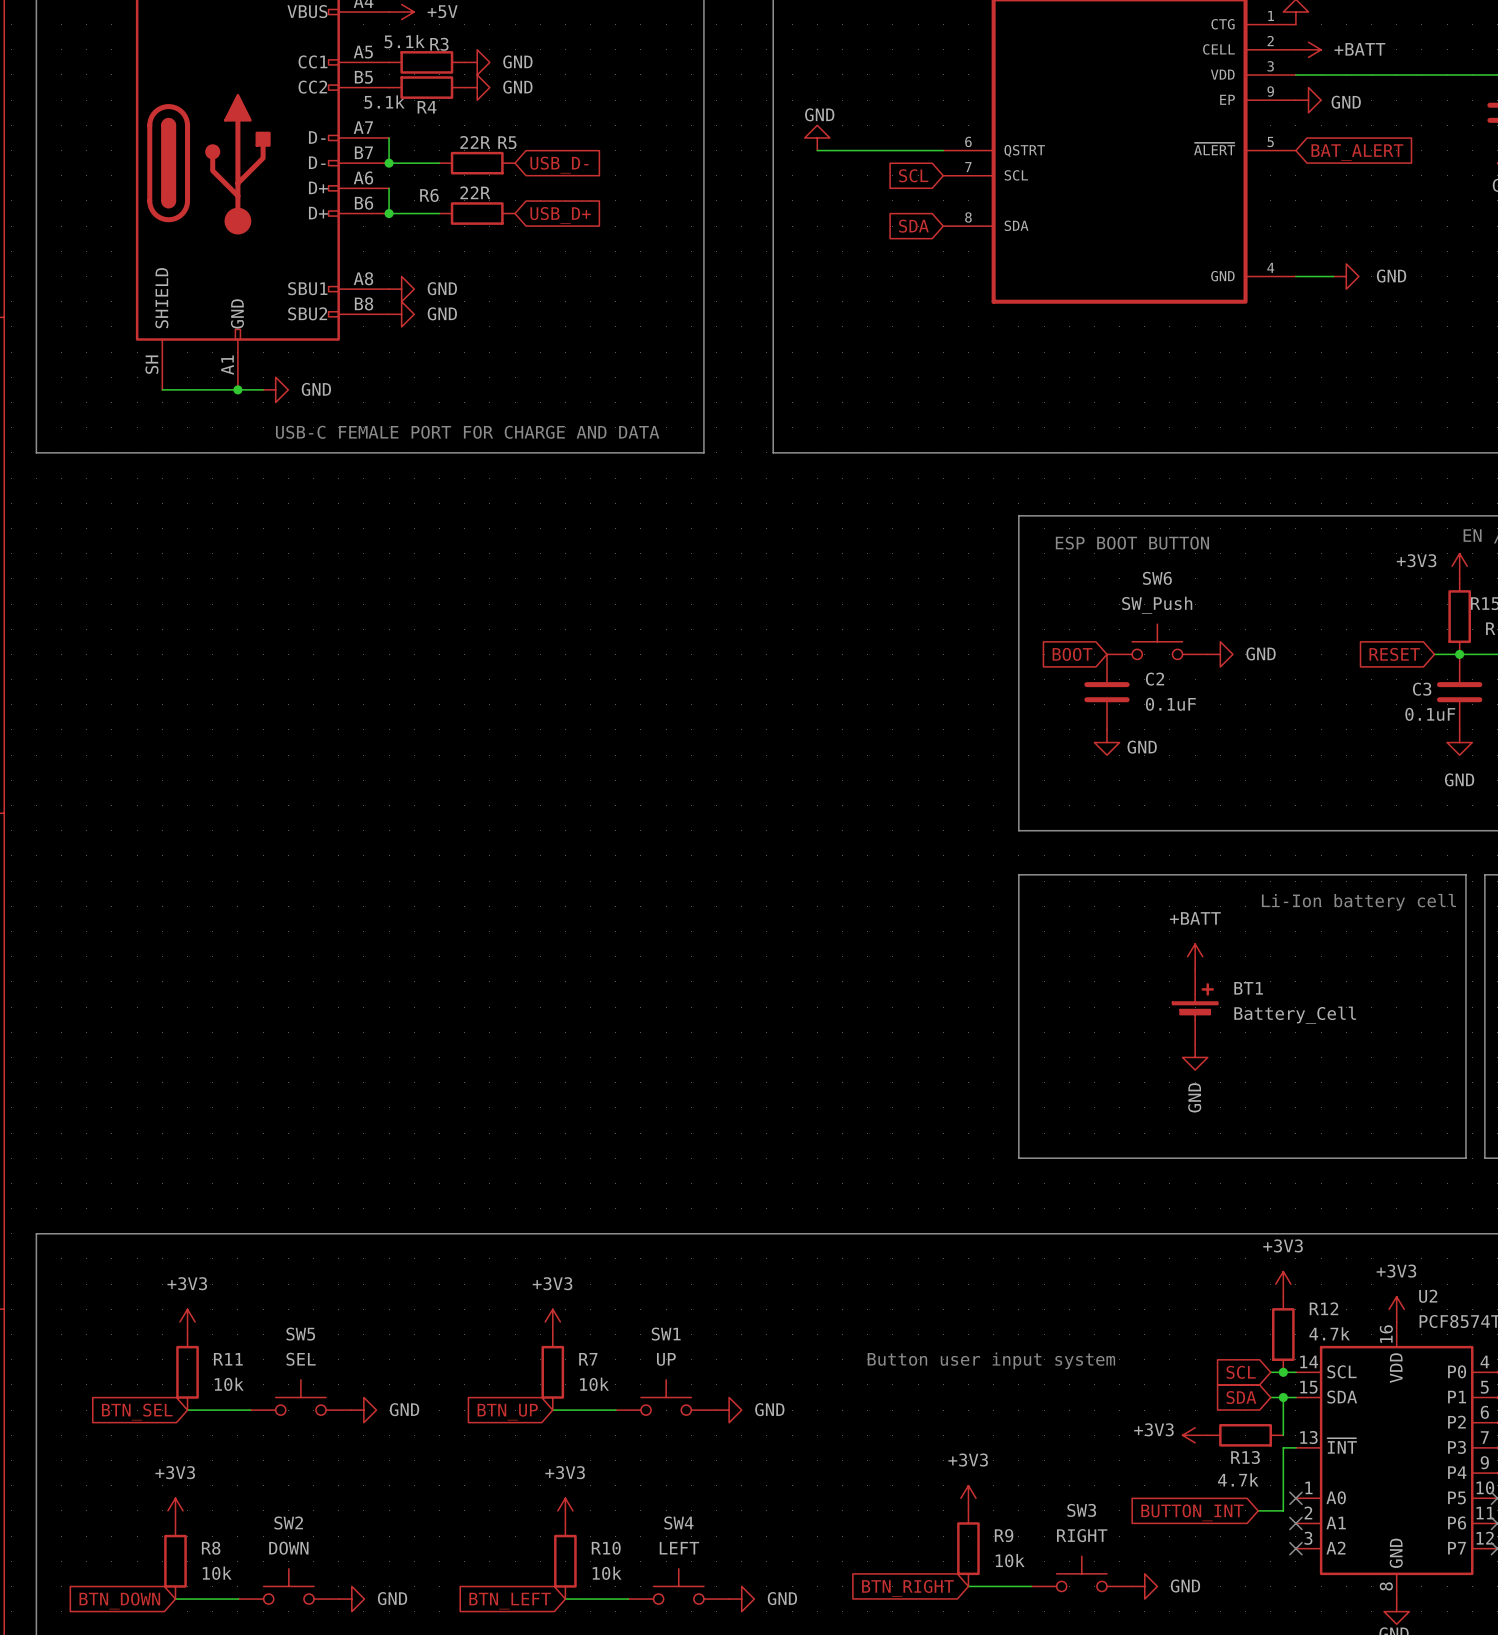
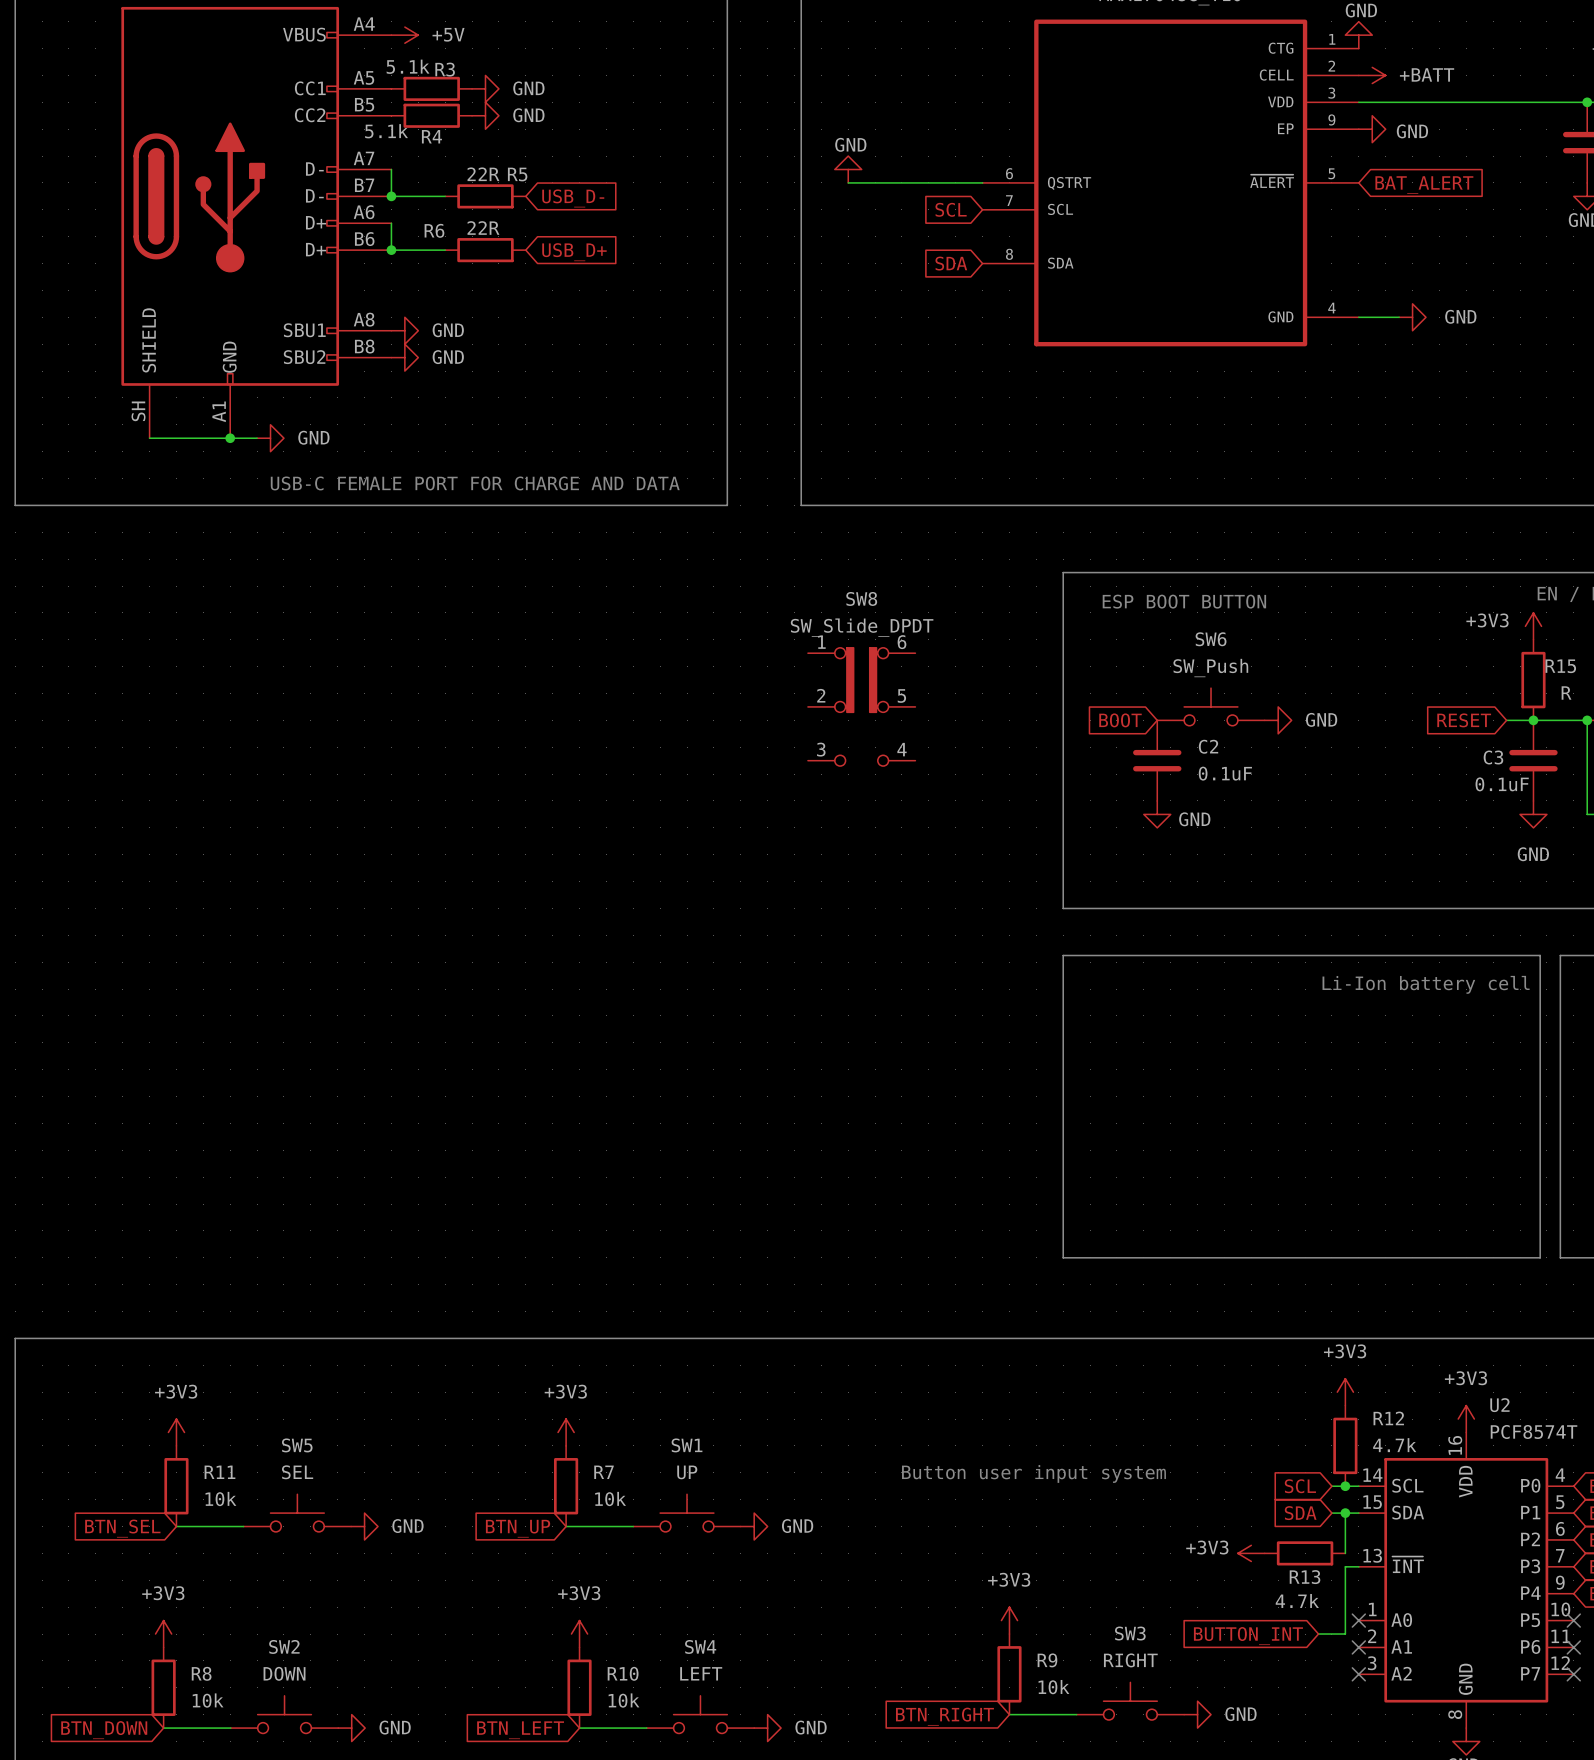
SW8: none -> SW_Slide_DPDT (861, 706)
power symbol: +BATT (1195, 956) -> none
BT1: Battery_Cell (1195, 1007) -> none
power symbol: GND (1195, 1057) -> none

